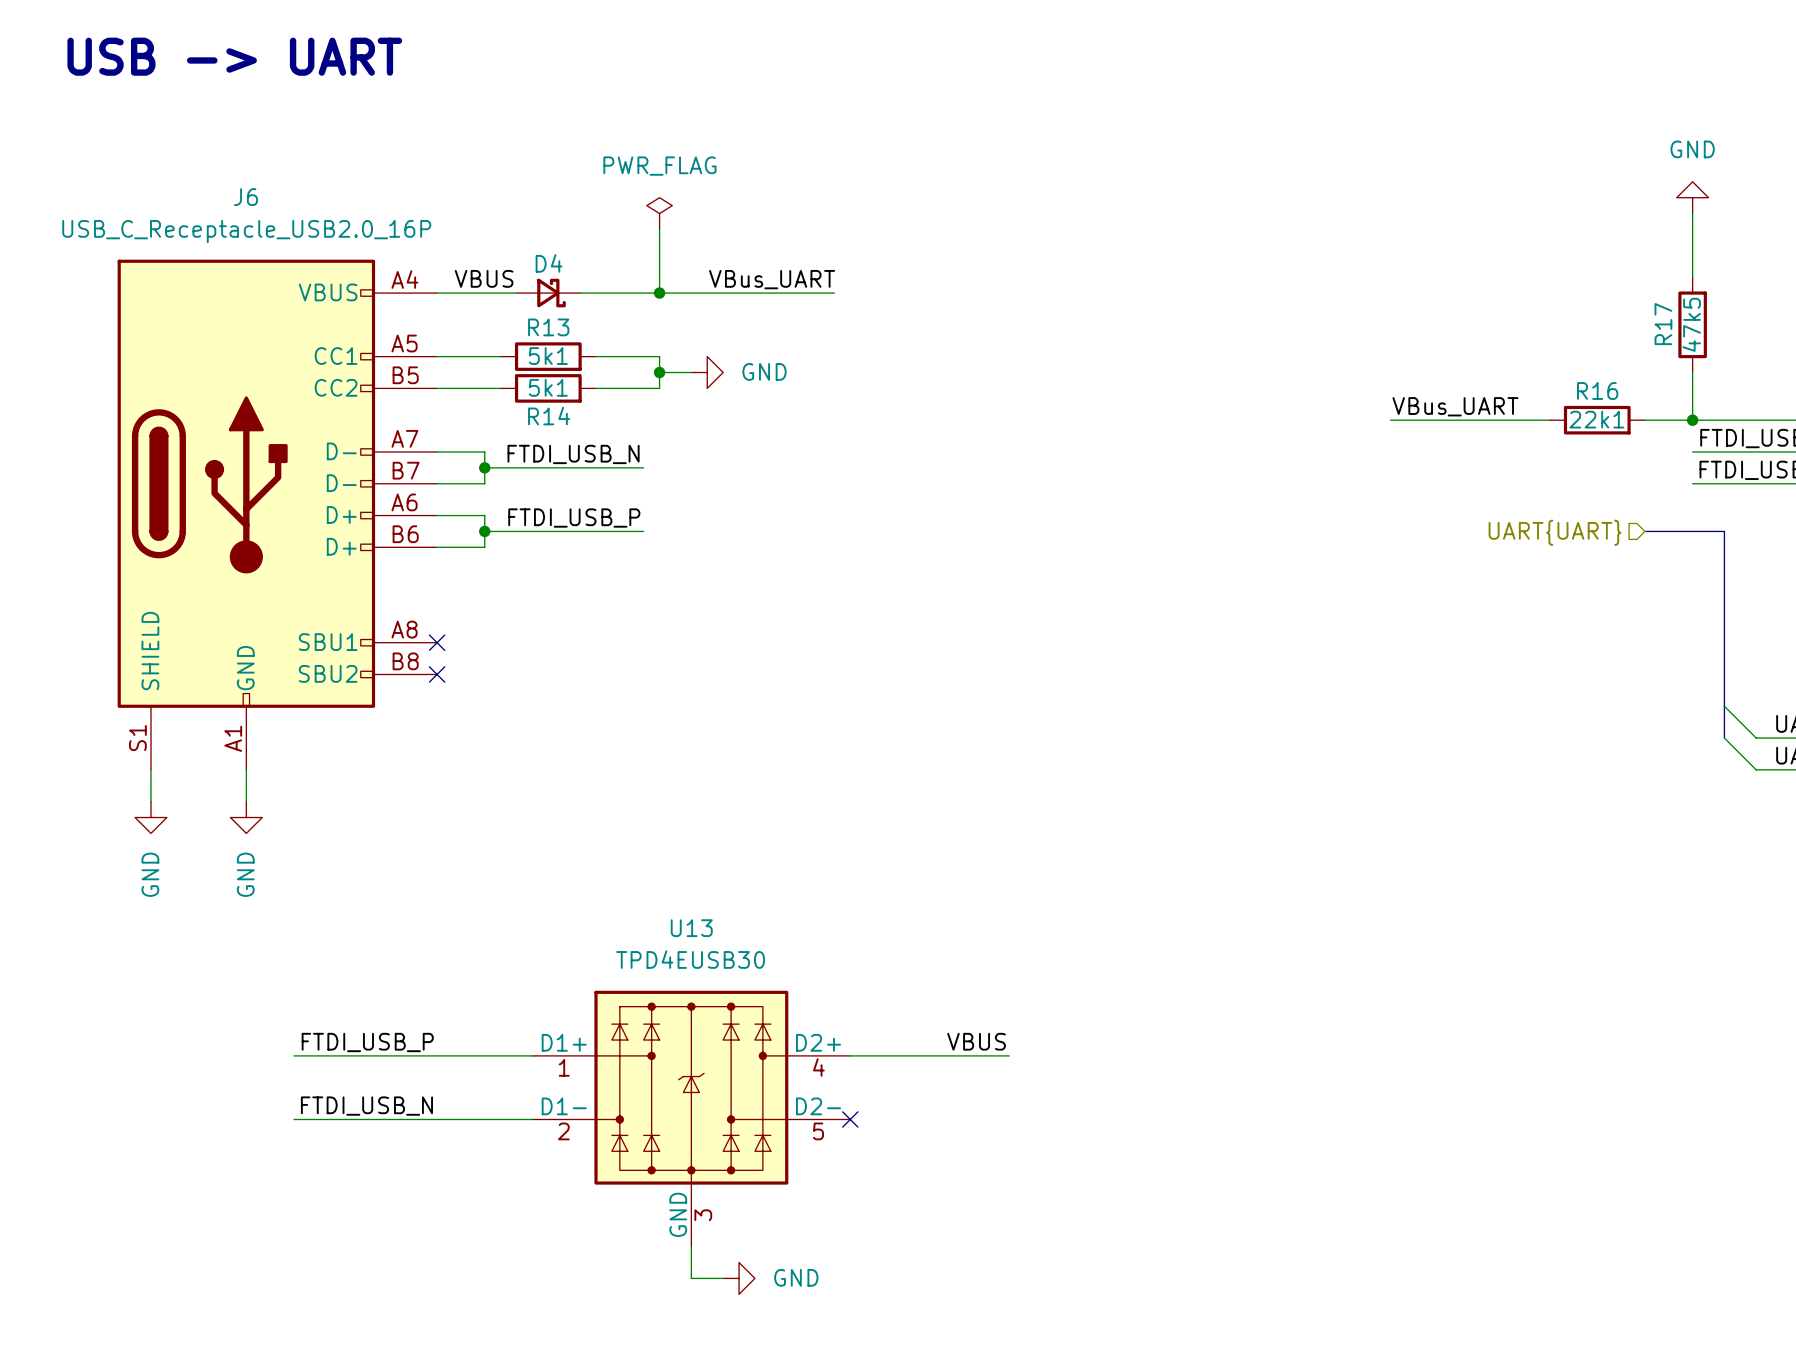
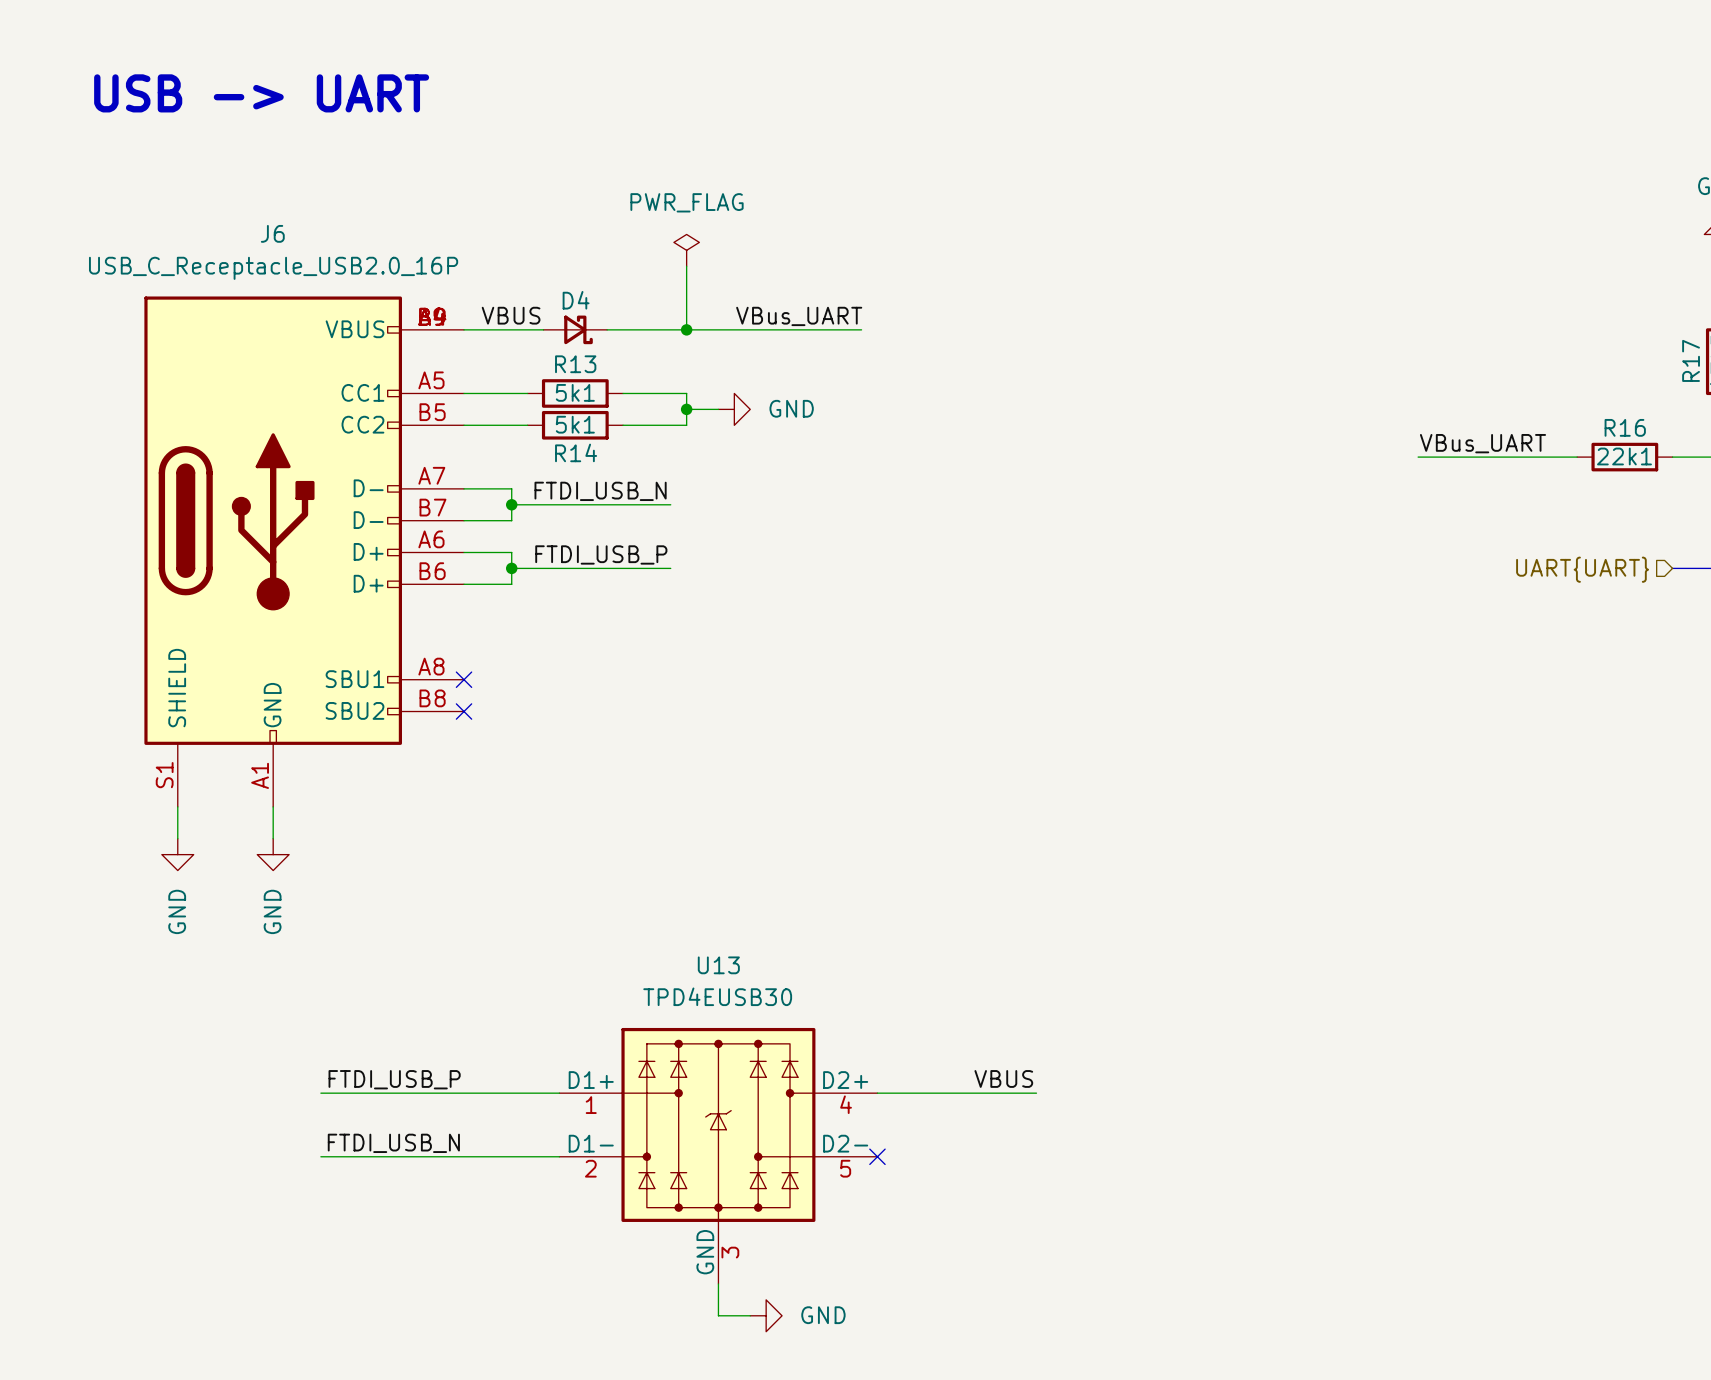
J6 symbol: [117, 259, 438, 770] -> [144, 296, 465, 807]

